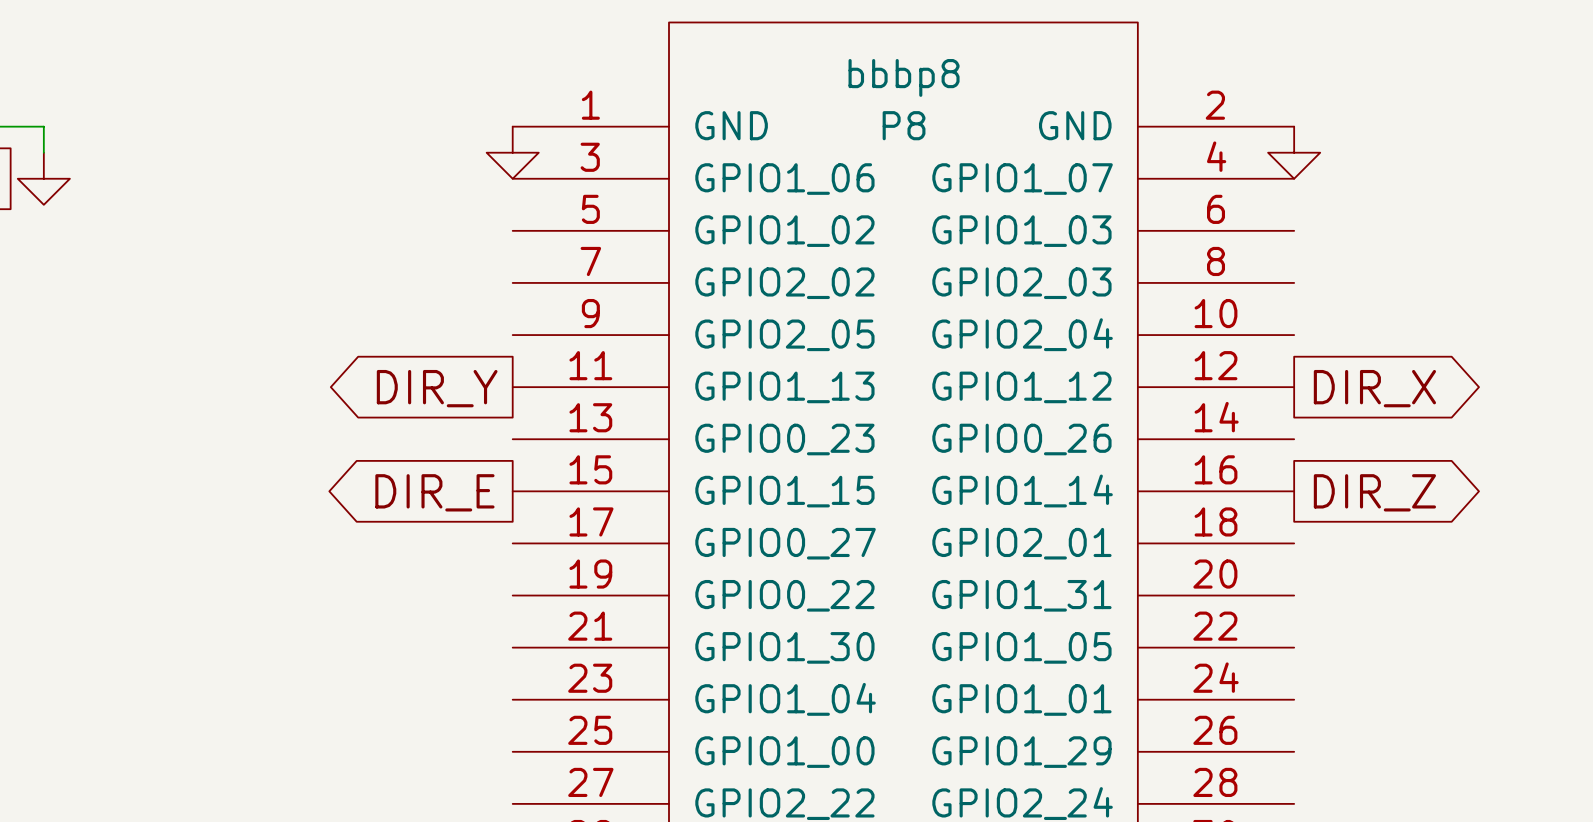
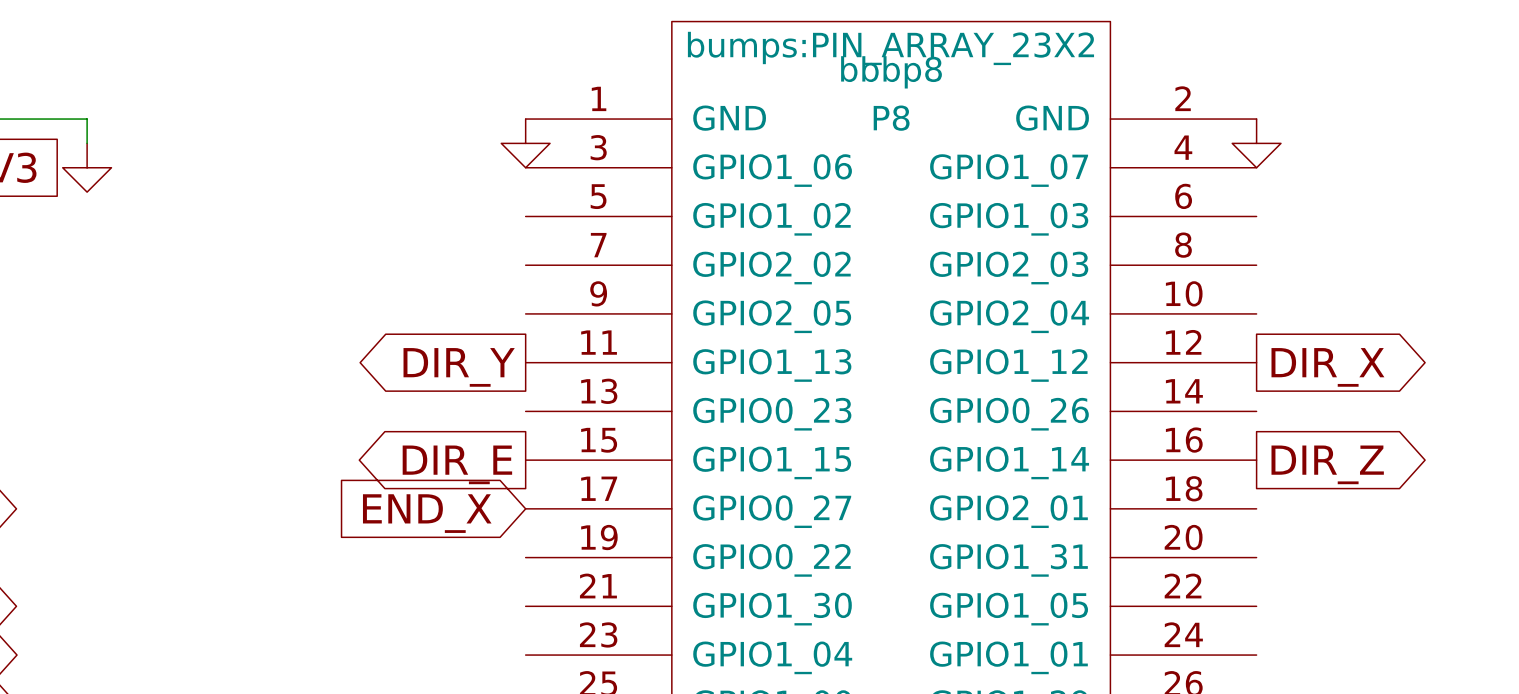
P8 text: none -> bumps:PIN_ARRAY_23X2 (890, 48)
global label: none -> END_X (427, 513)

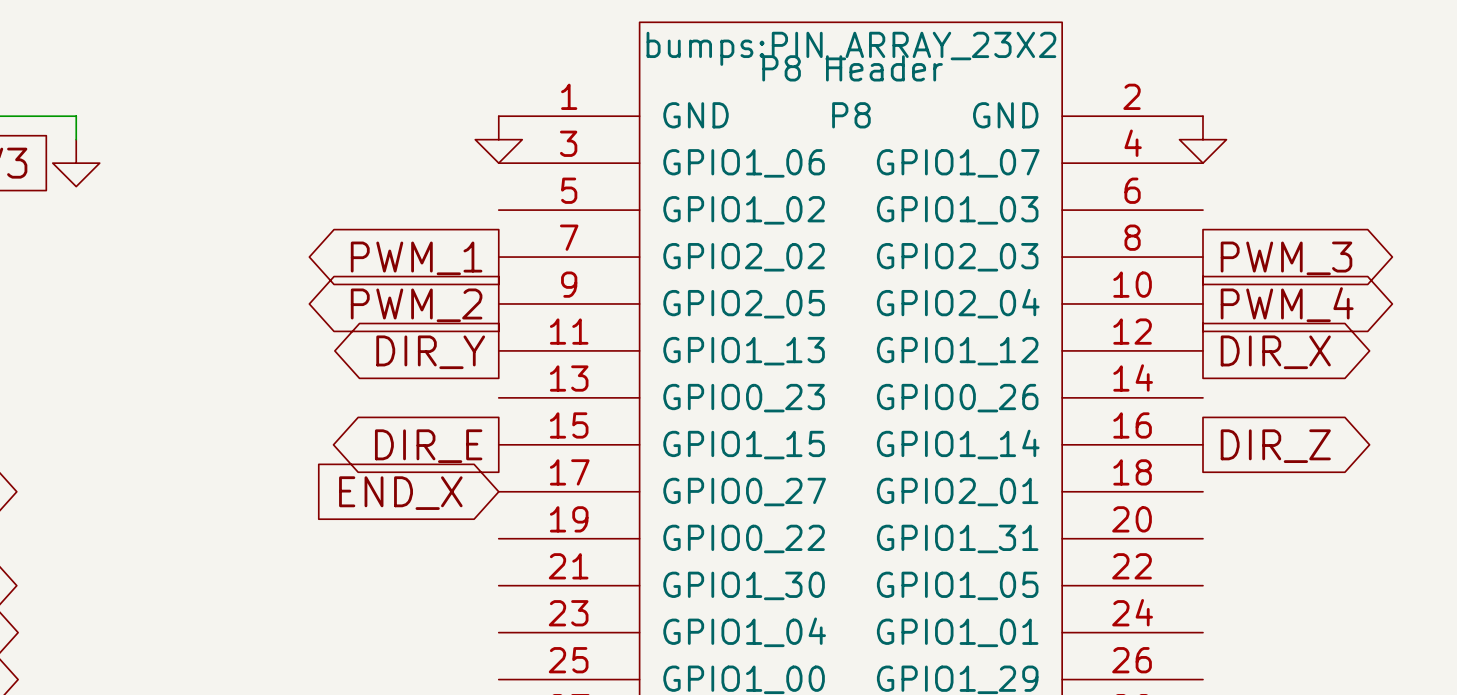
P8 value: bbbp8 (891, 72) -> P8 Header (852, 68)
global label: none -> PWM_1 (416, 258)
global label: none -> PWM_3 (1286, 258)
global label: none -> PWM_2 (416, 305)
global label: none -> PWM_4 (1287, 304)

